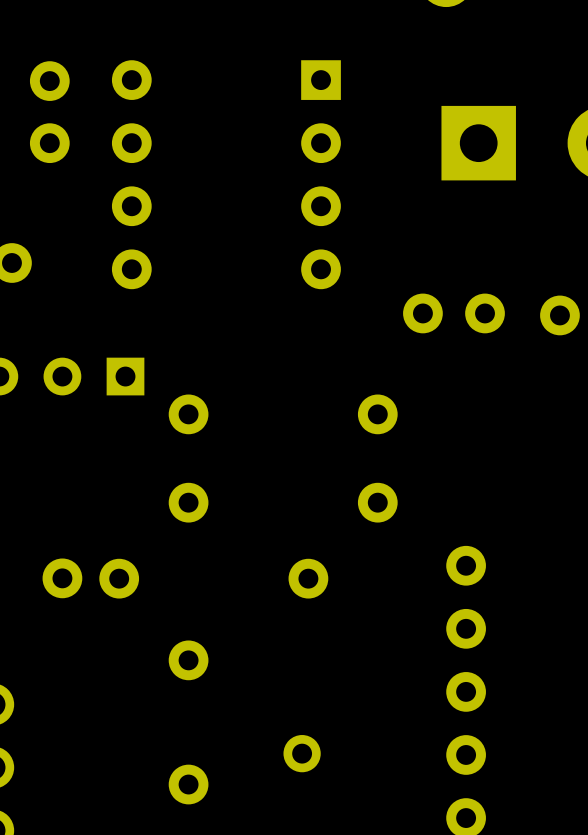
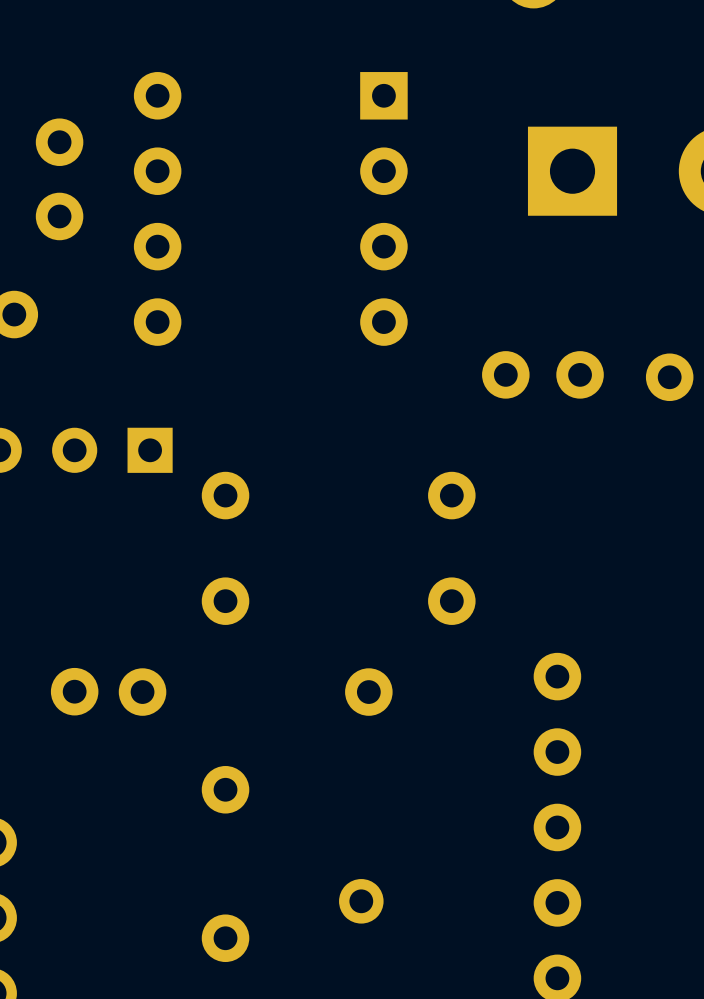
part position: (49, 112) -> (59, 179)

